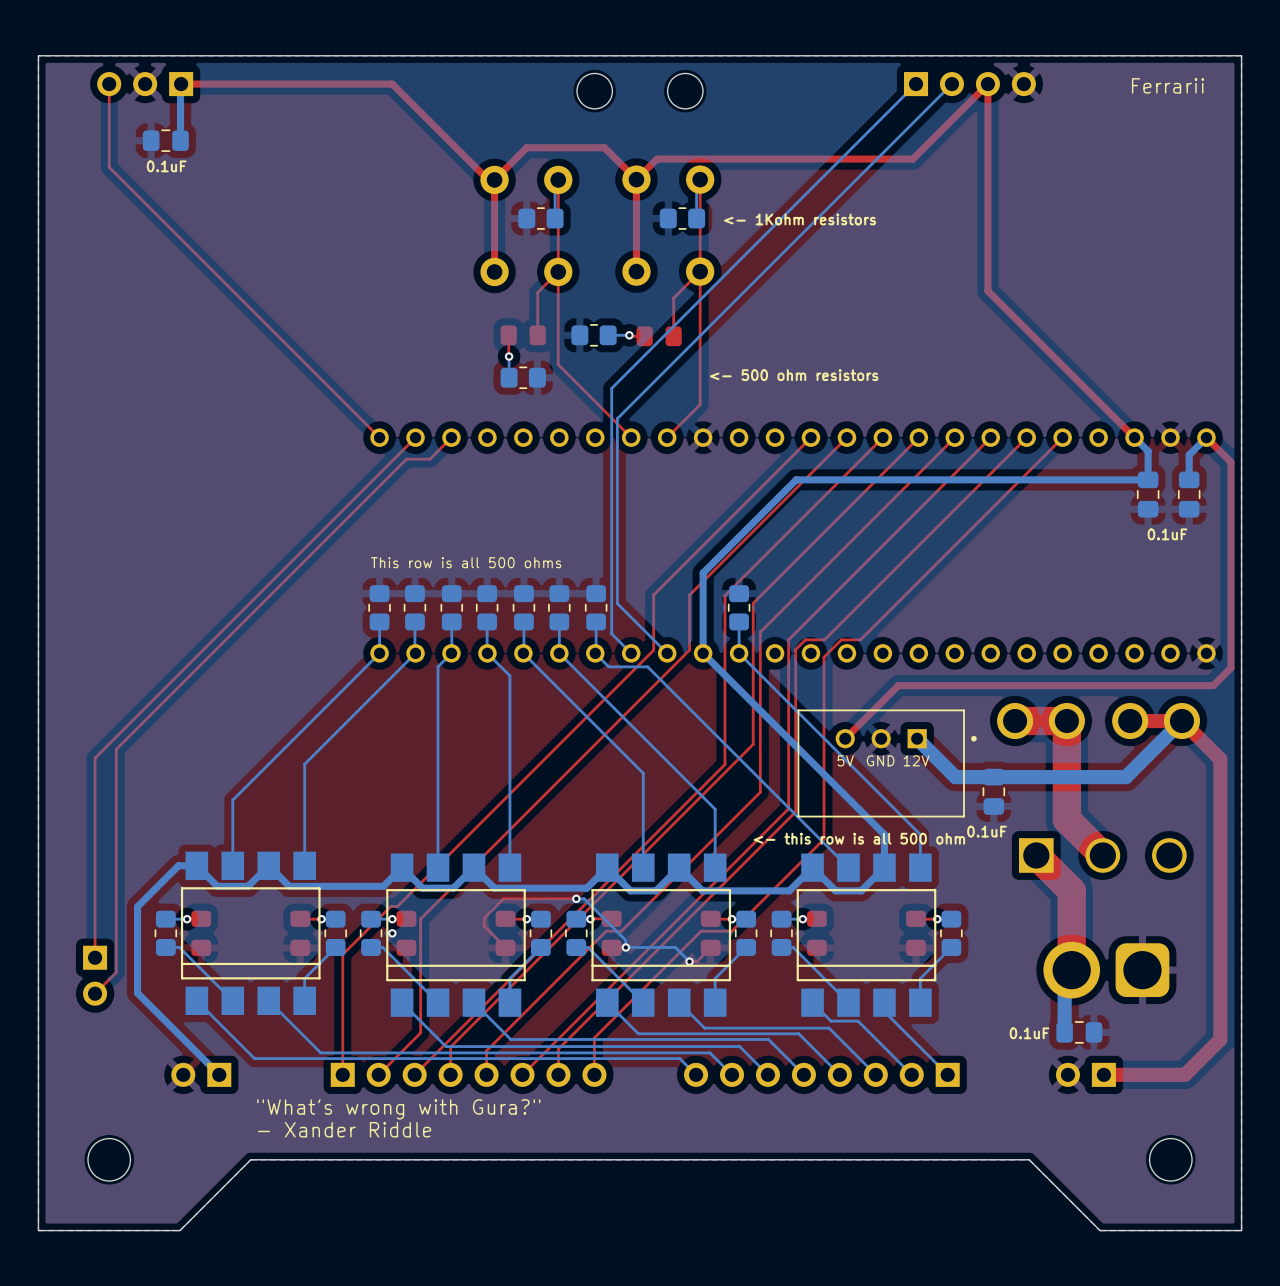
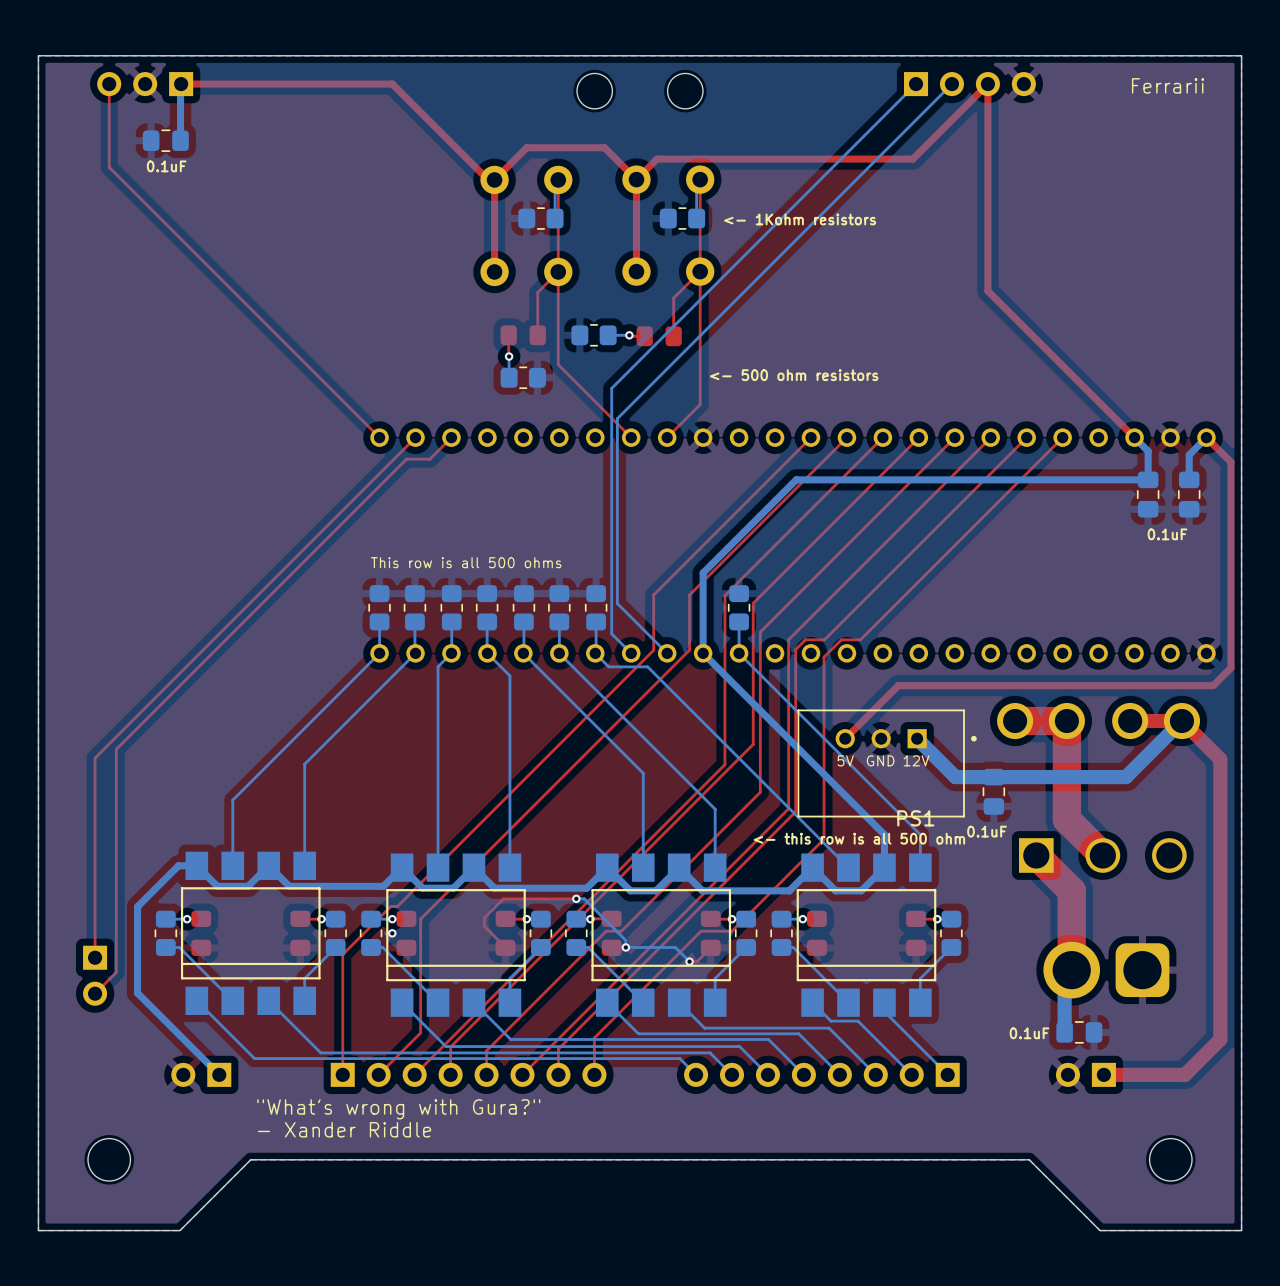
PS1 name: none -> PS1 (915, 818)

